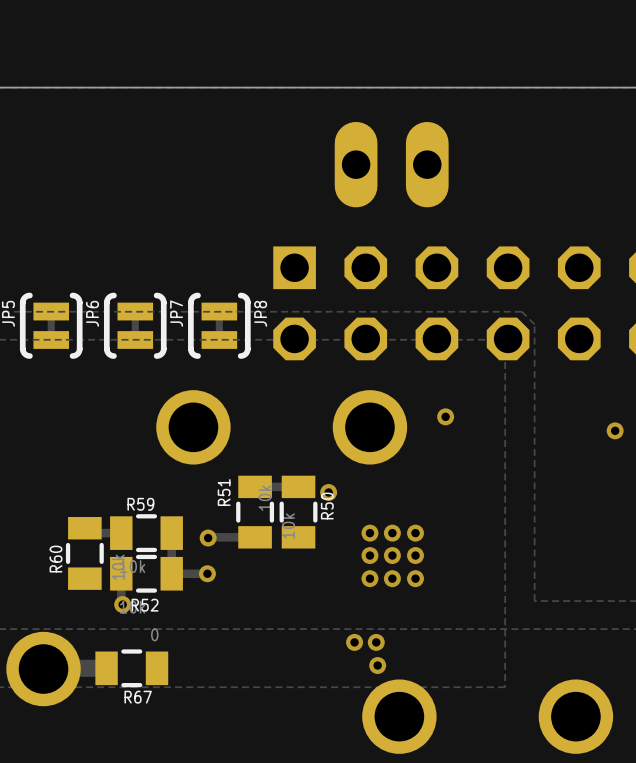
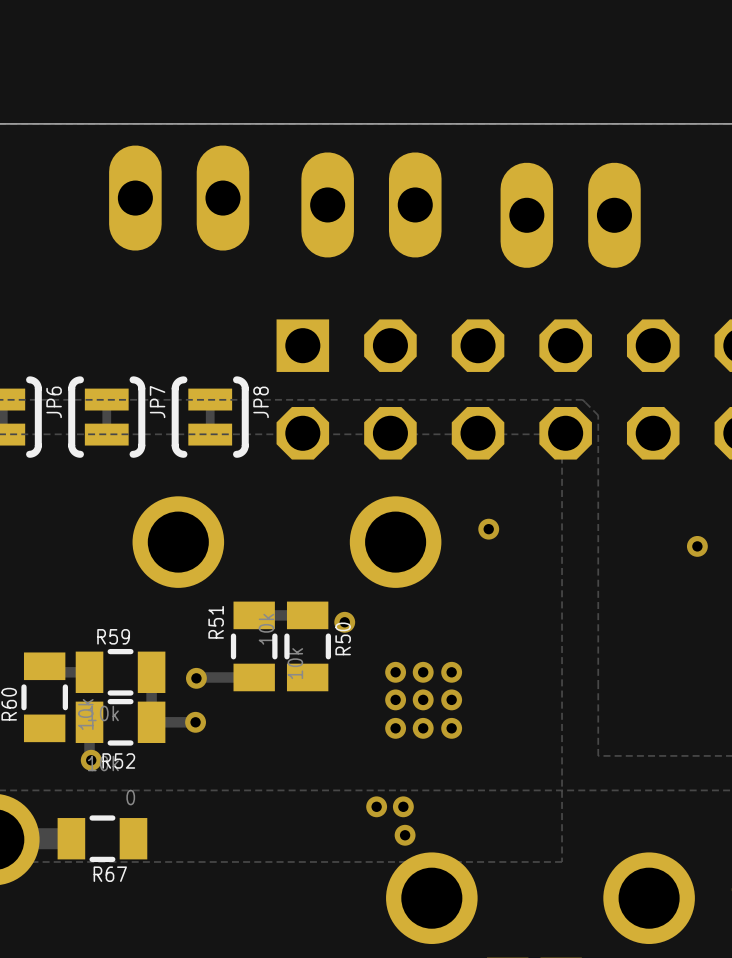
part: none -> (179, 198)
part: none -> (570, 215)
part position: (391, 164) -> (371, 204)

